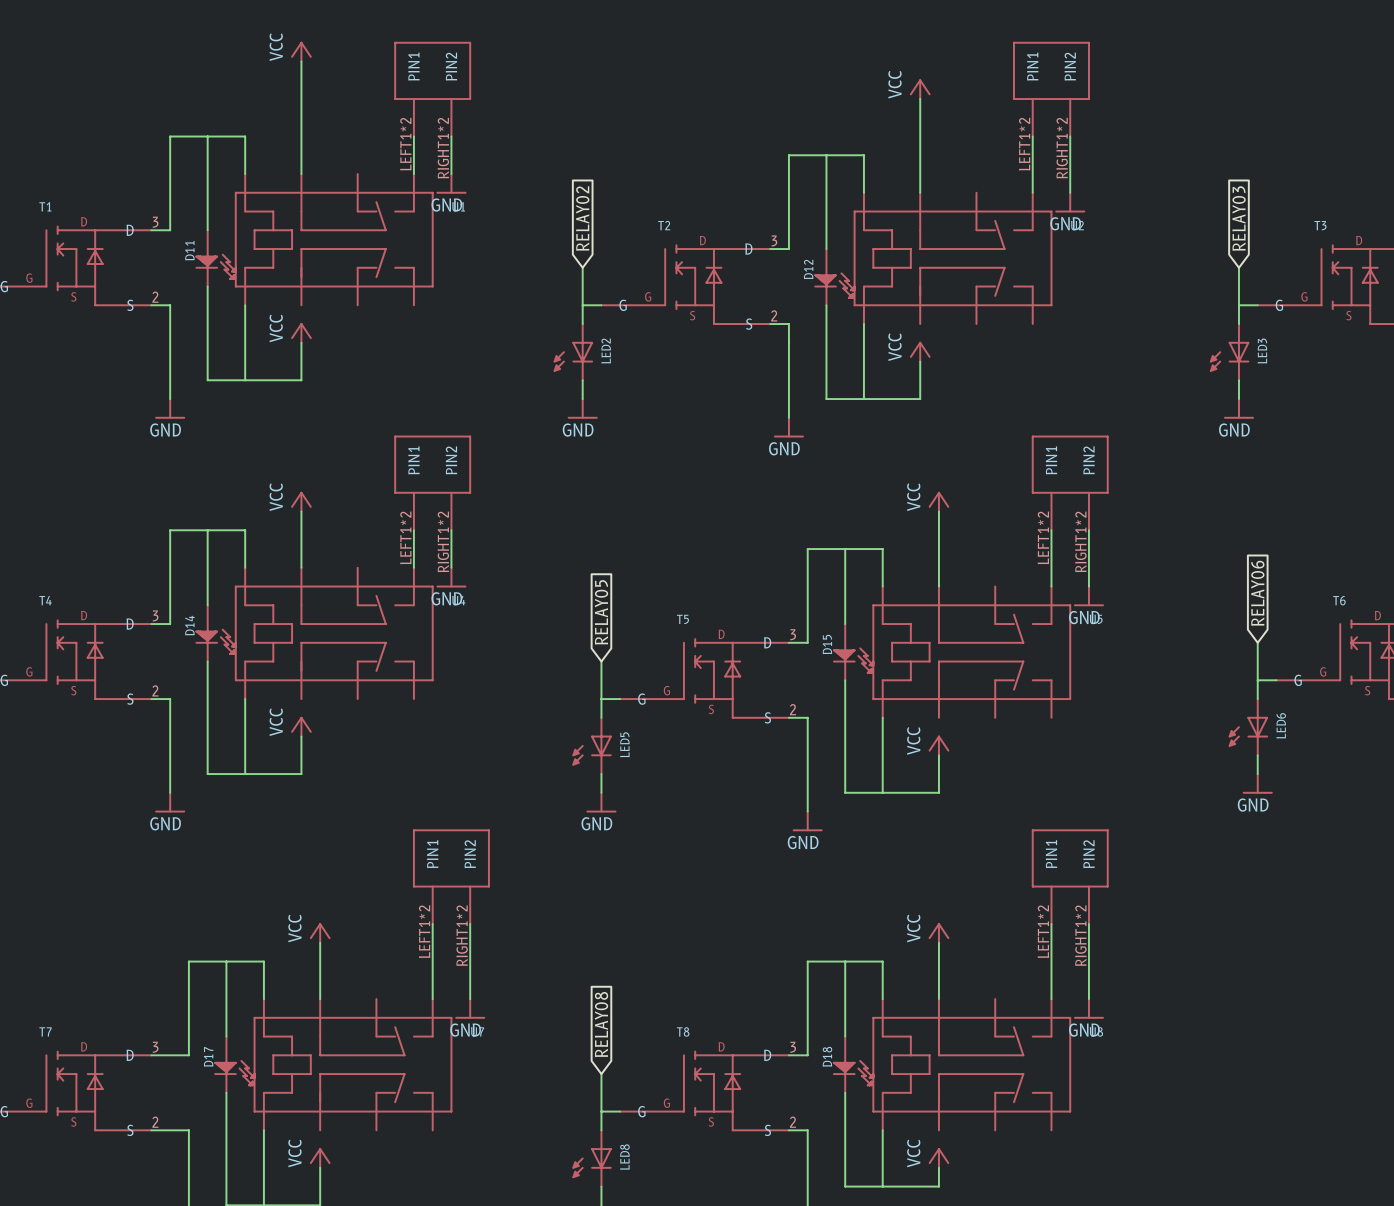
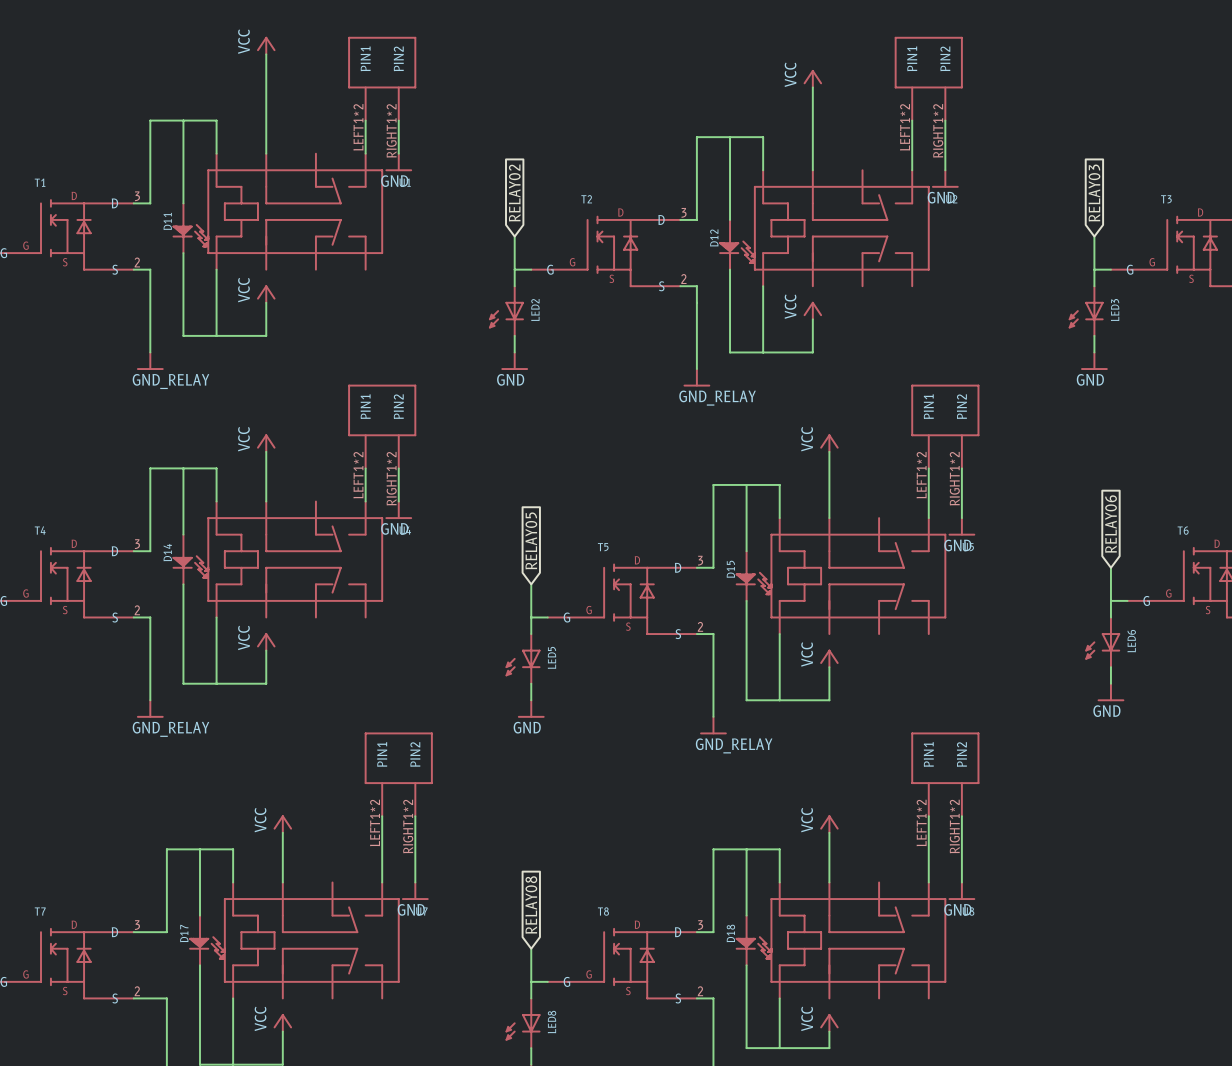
power symbol: GND (170, 408) -> GND_RELAY (150, 361)
power symbol: GND (788, 427) -> GND_RELAY (696, 377)
power symbol: GND (170, 802) -> GND_RELAY (150, 708)
power symbol: GND (807, 821) -> GND_RELAY (713, 725)

